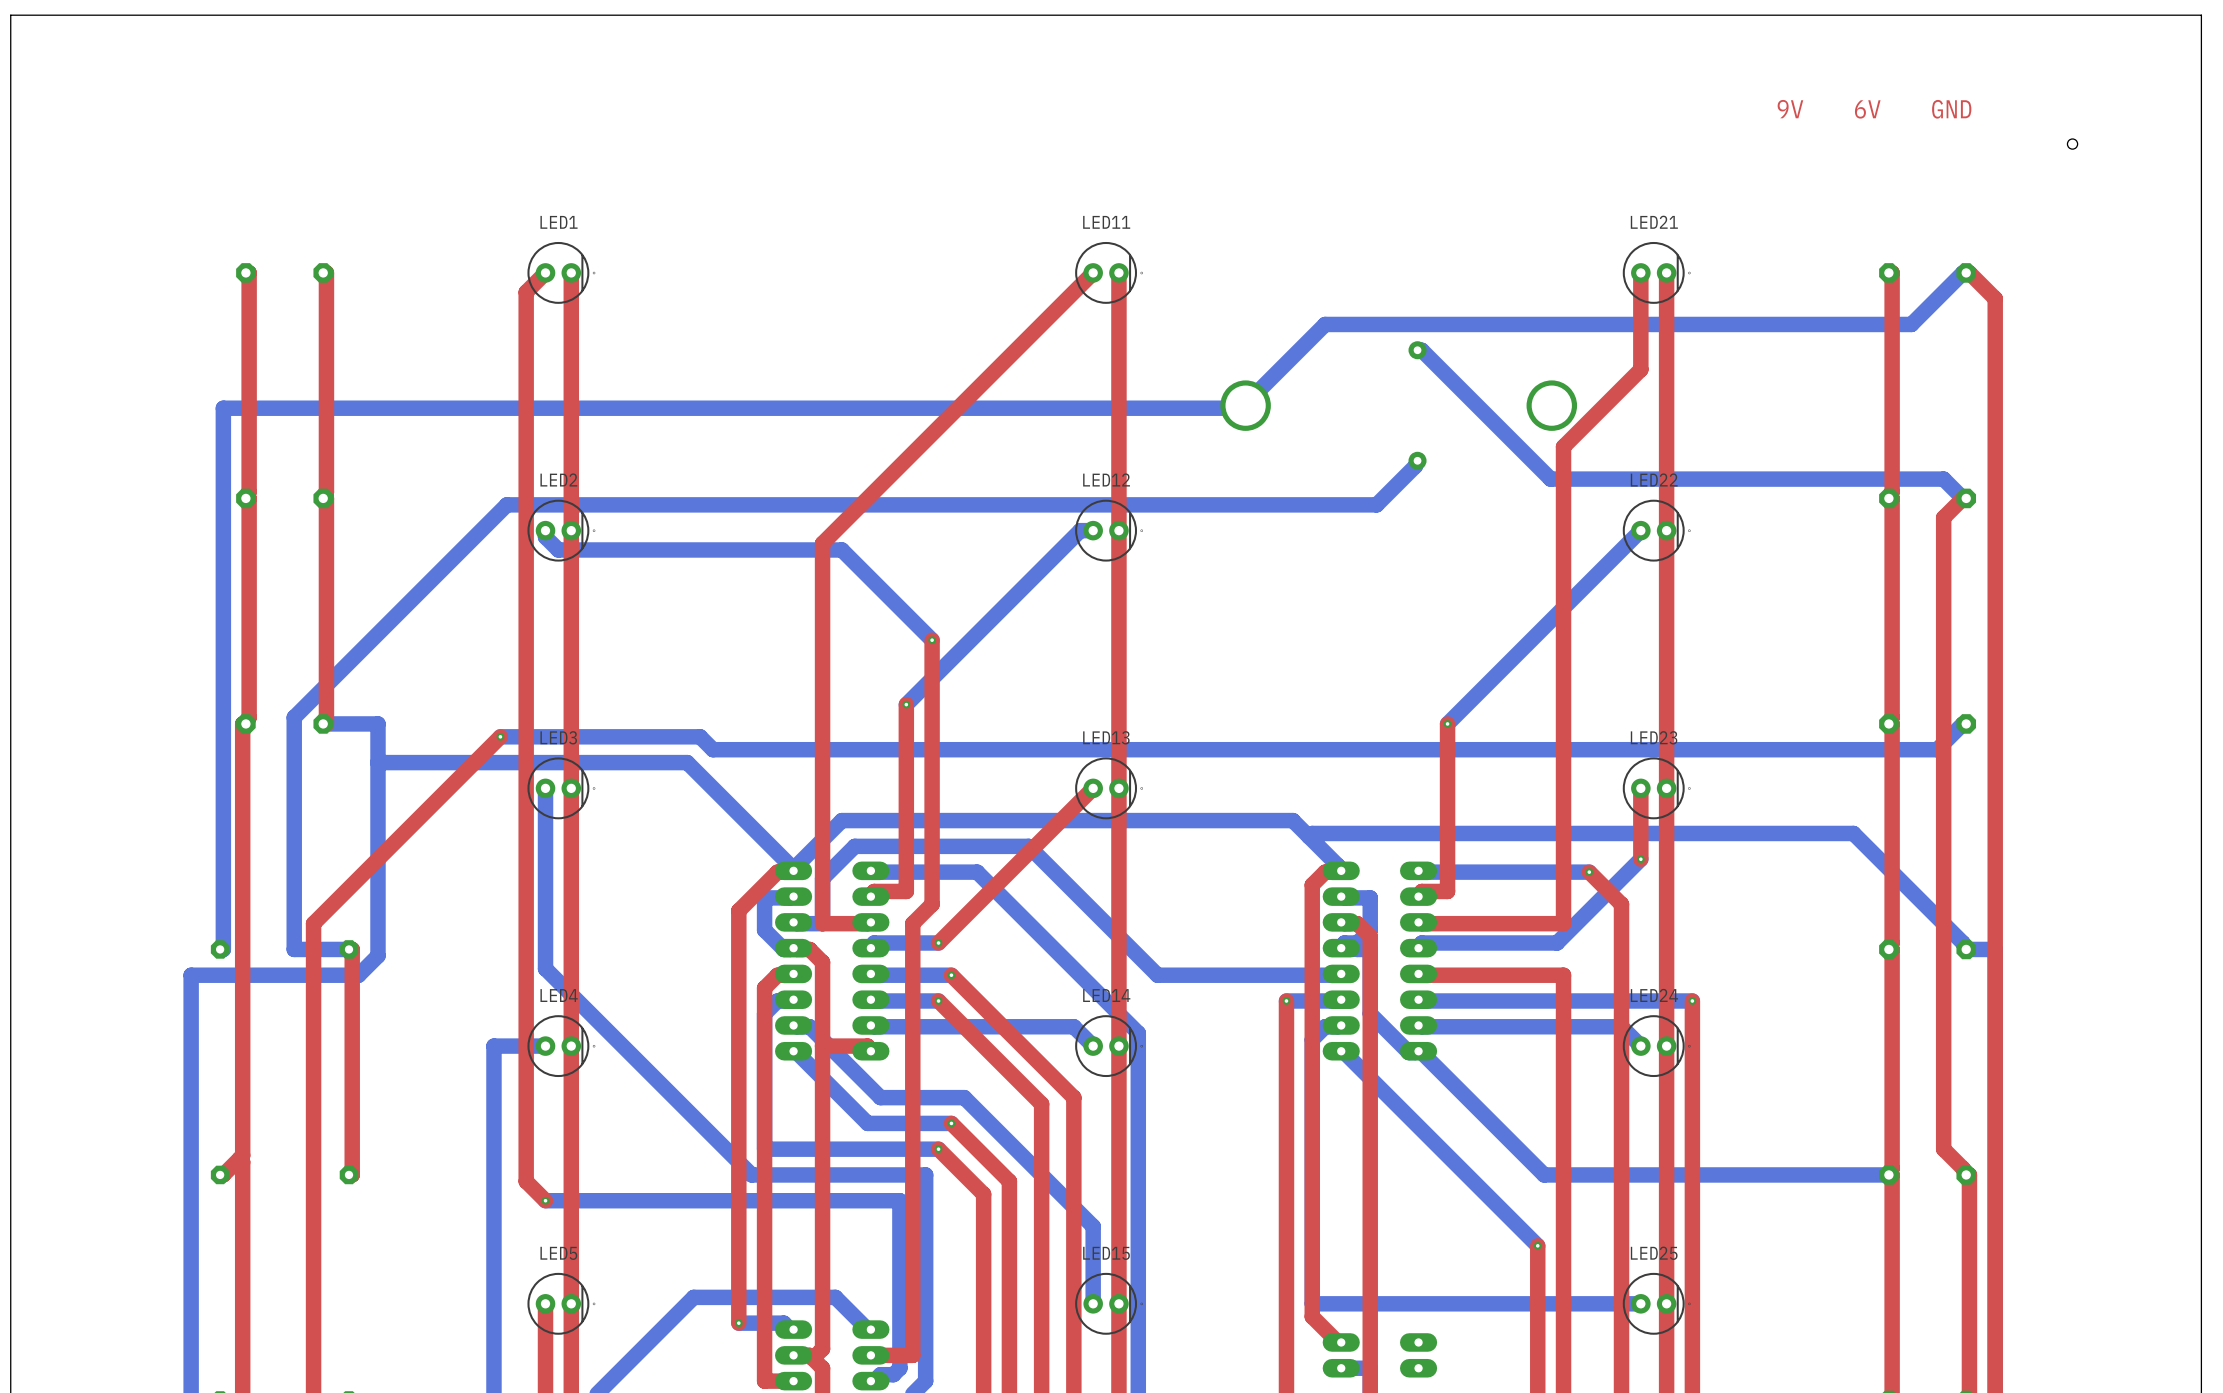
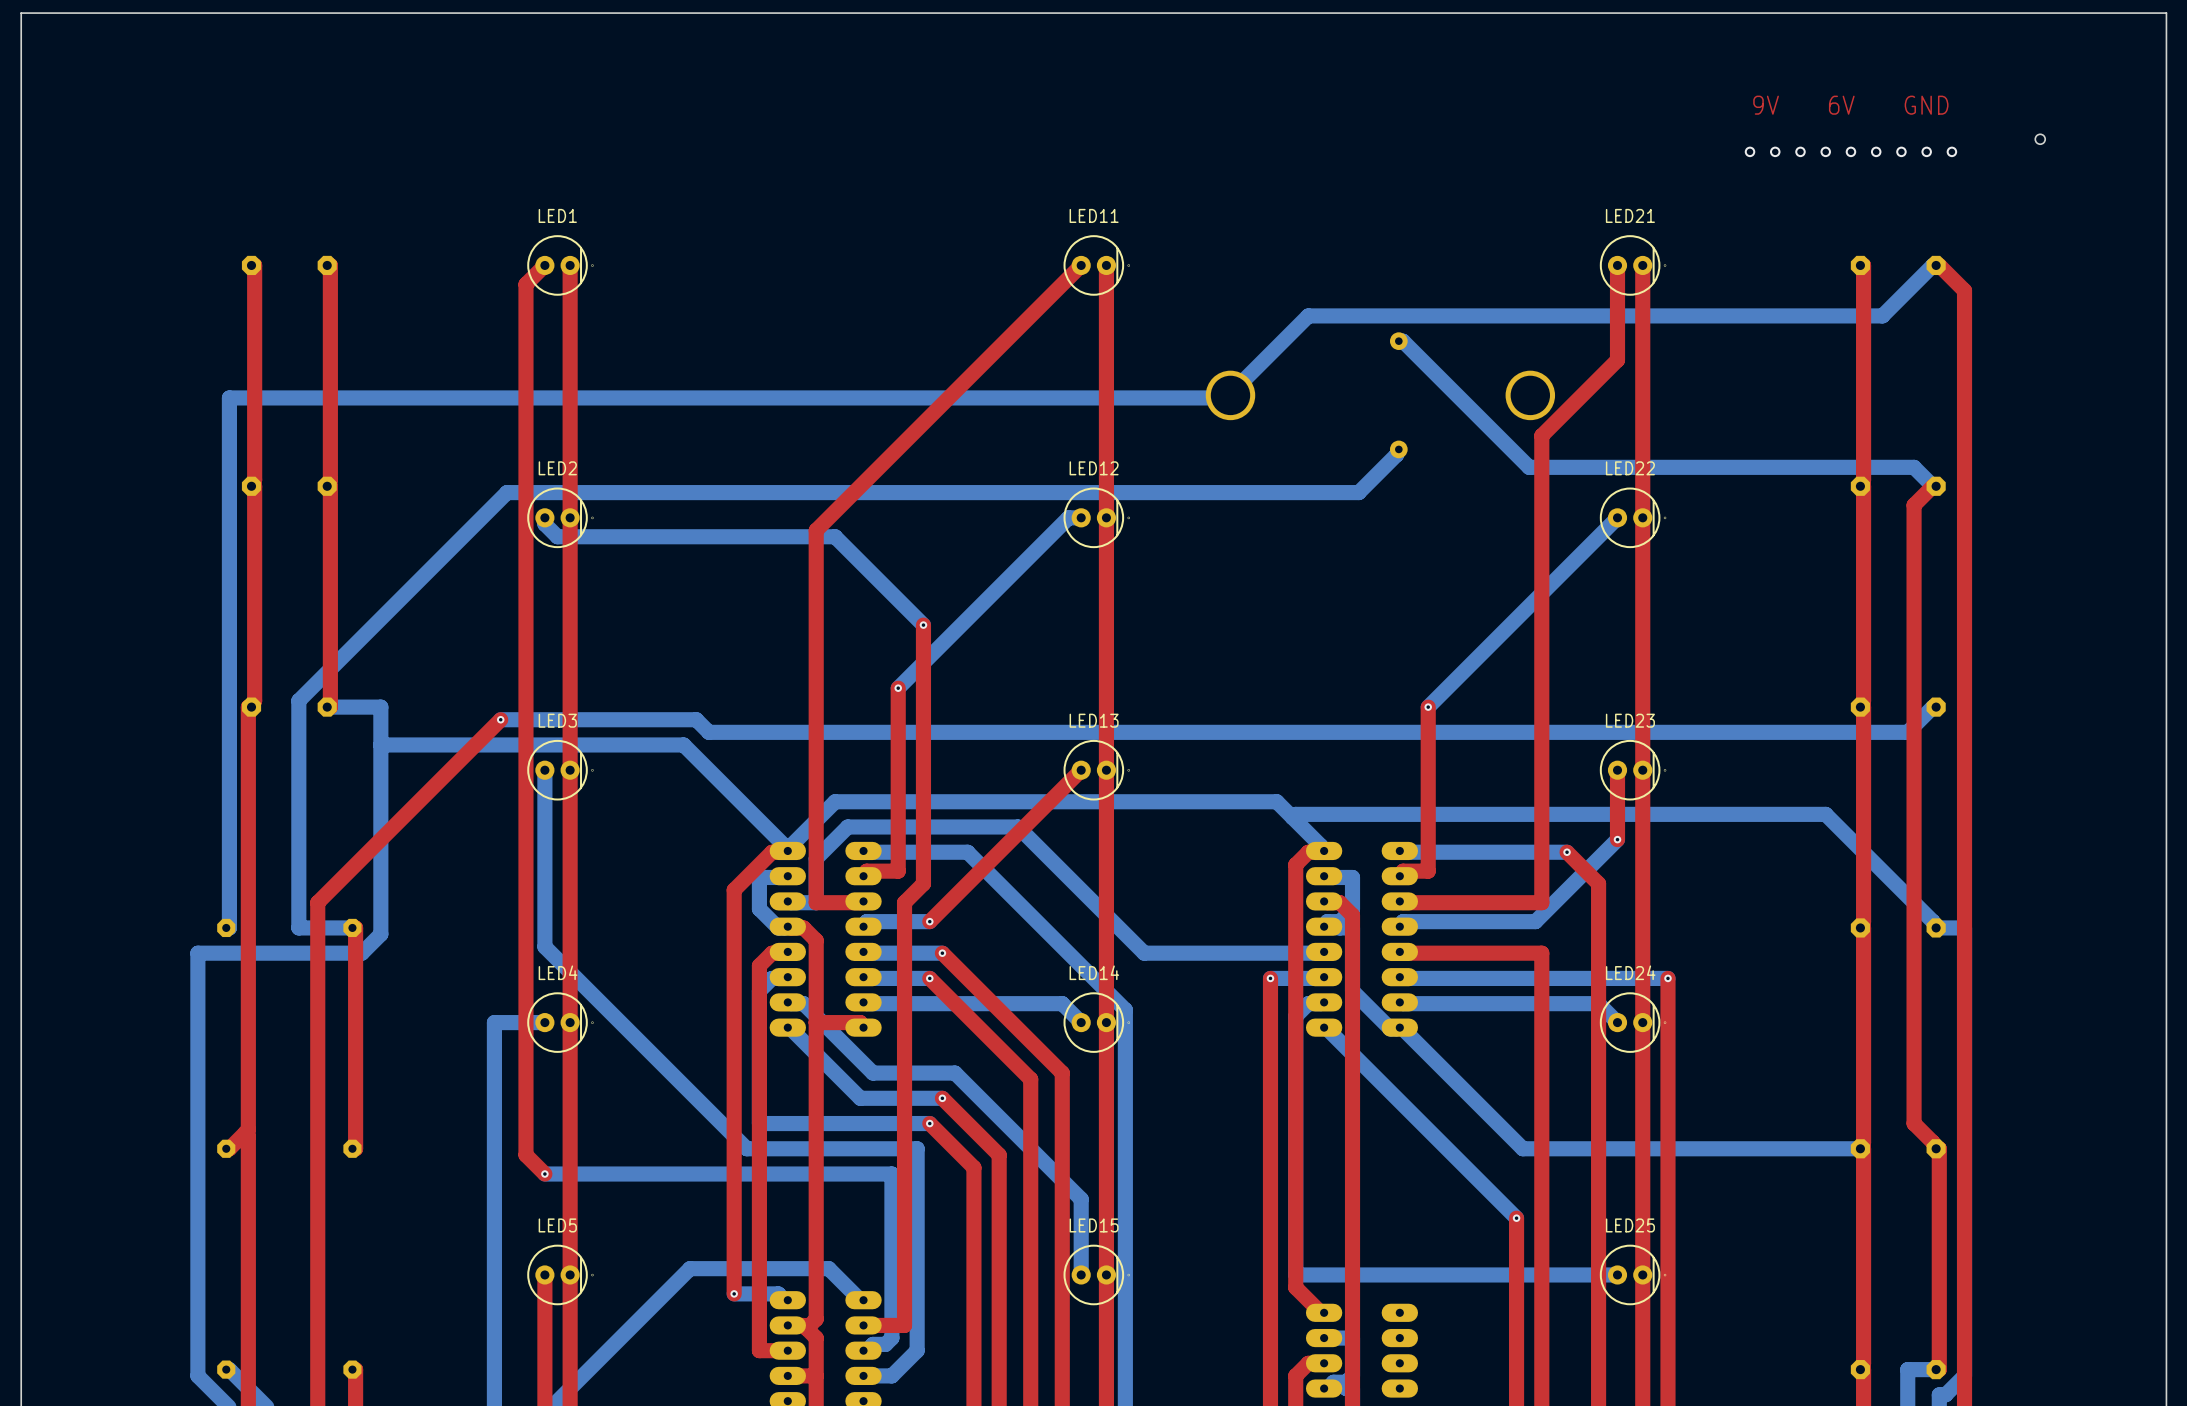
via: none -> (1750, 151)
via: none -> (1775, 151)
via: none -> (1800, 151)
via: none -> (1825, 151)
via: none -> (1850, 151)
via: none -> (1876, 151)
via: none -> (1901, 151)
via: none -> (1926, 151)
via: none -> (1951, 151)

